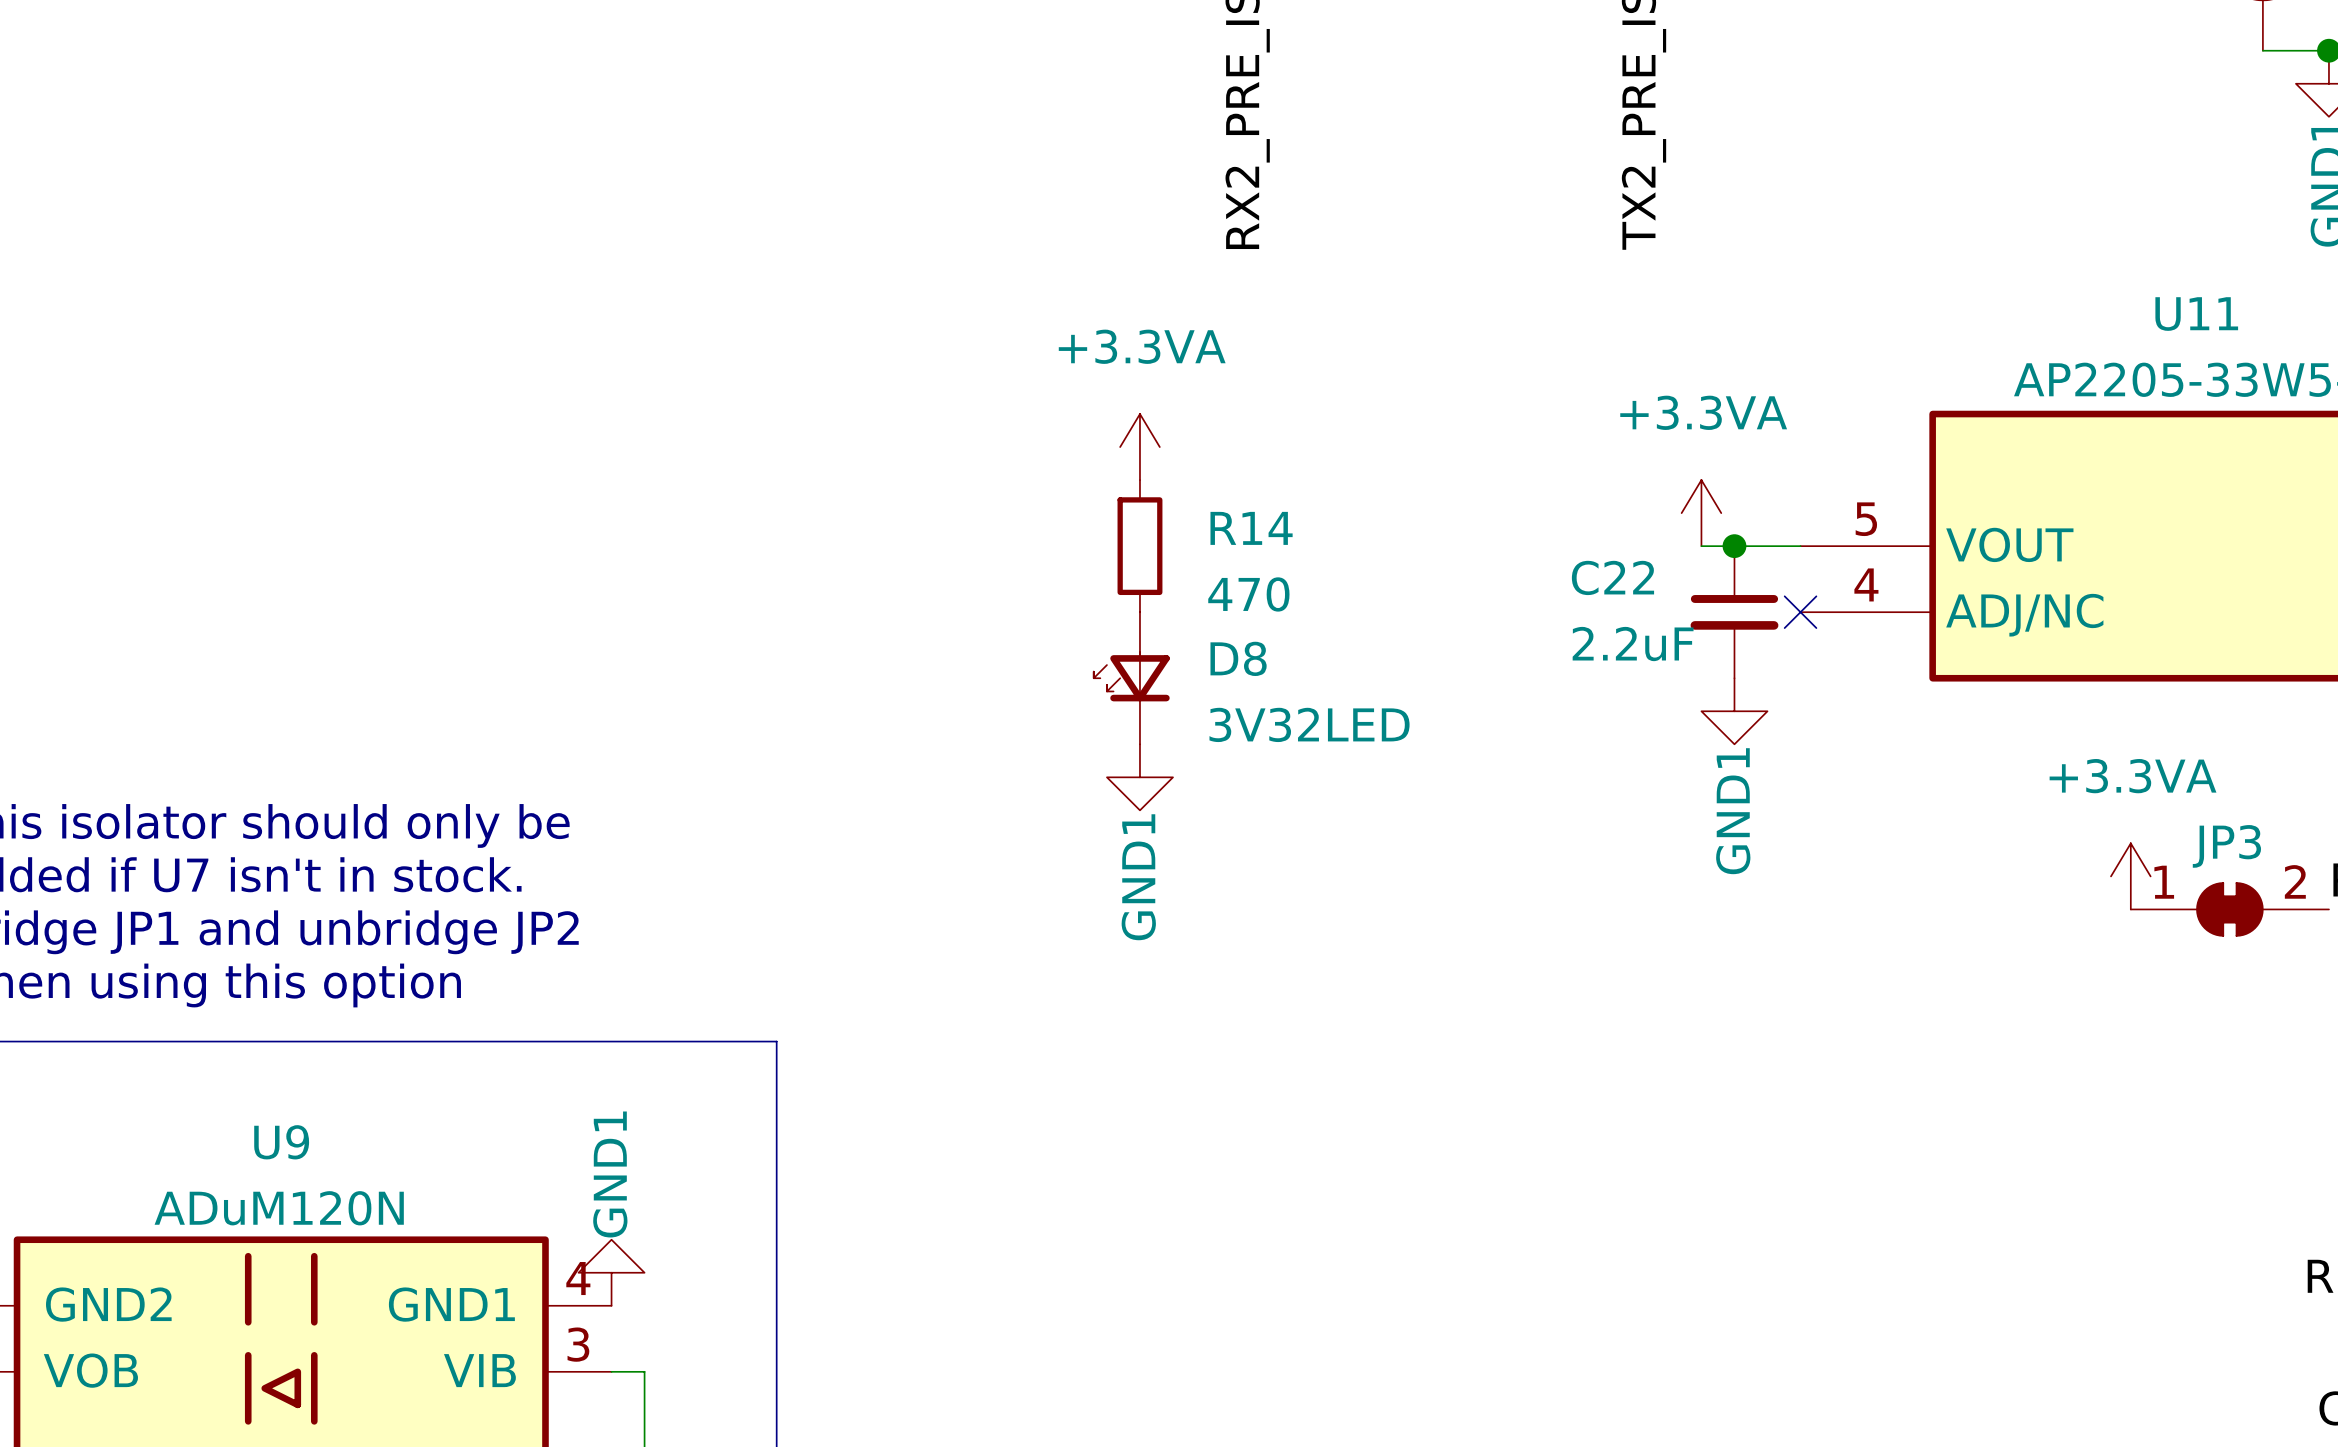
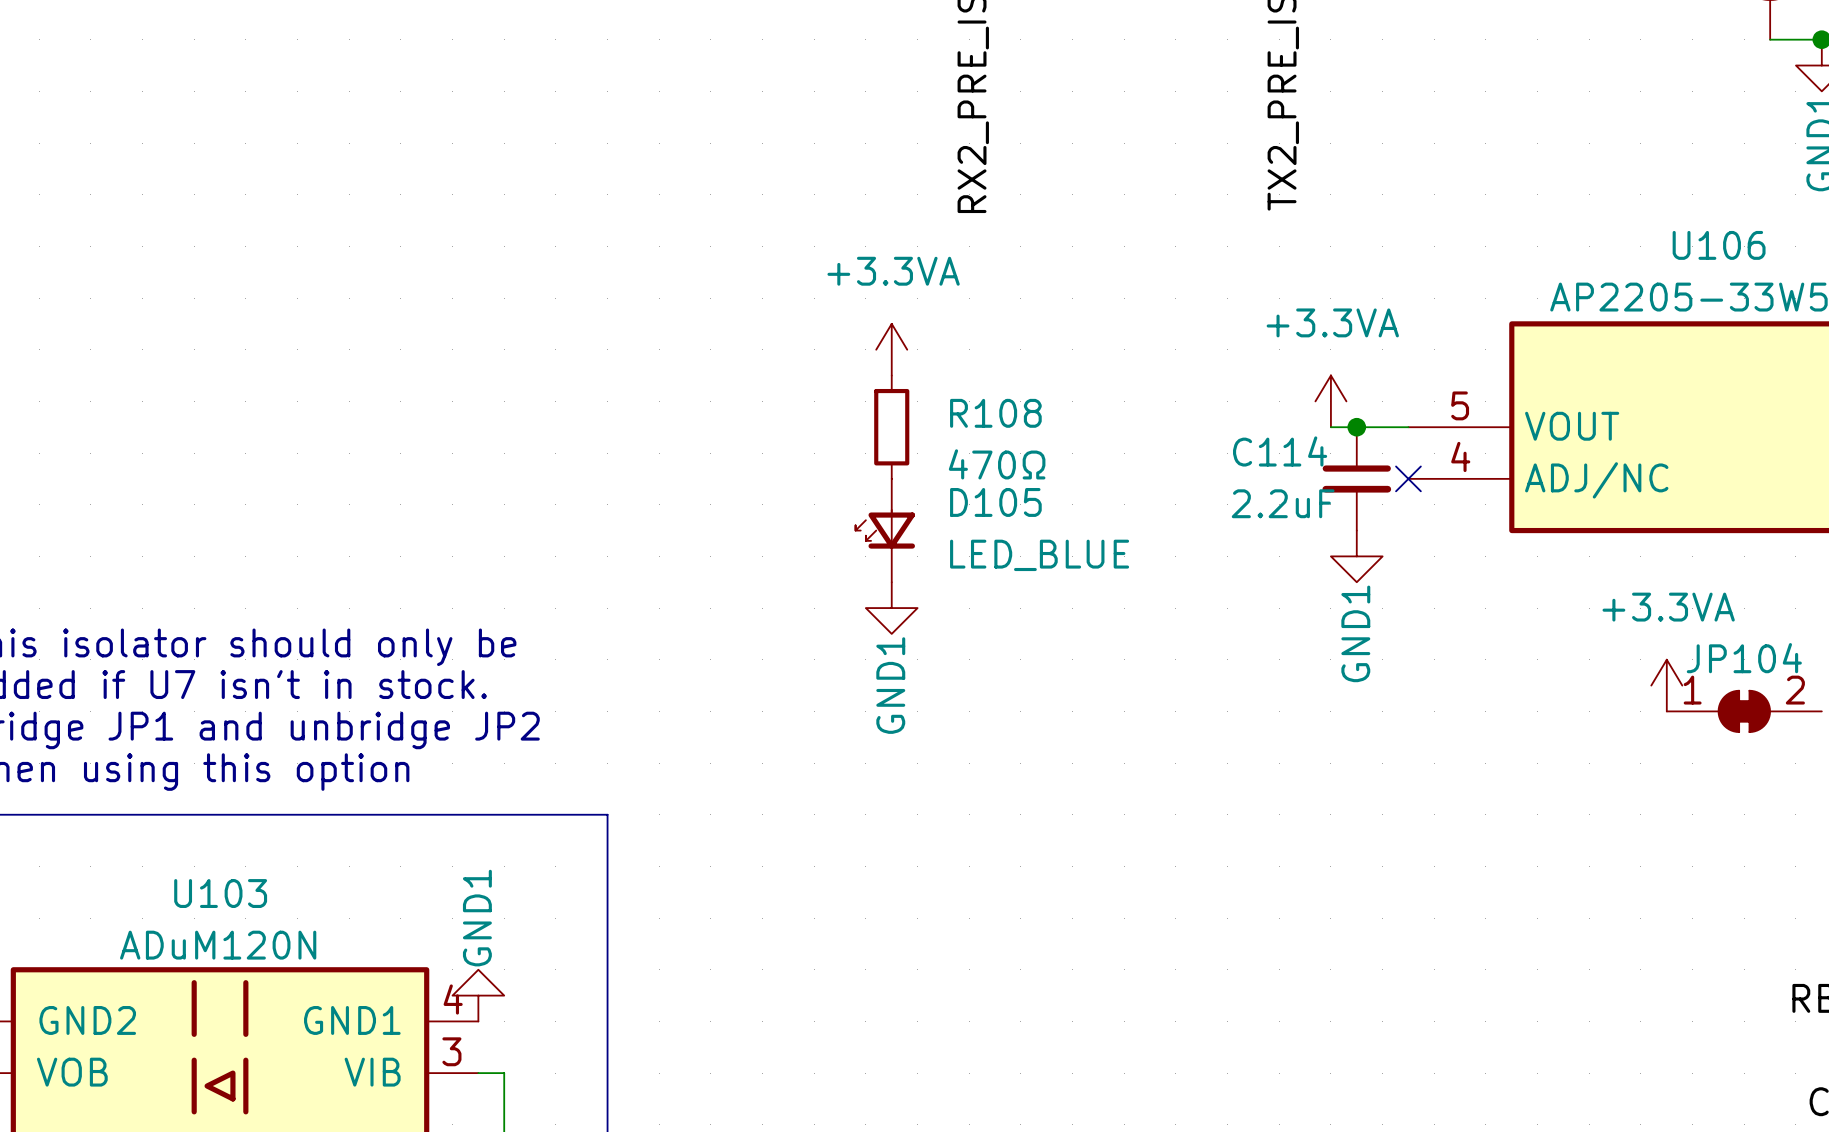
U11 name: U11 (2196, 314) -> U106 (1719, 245)
R14 name: R14 (1251, 528) -> R108 (995, 413)
C22 name: C22 (1612, 577) -> C114 (1280, 451)
R14 value: 470 (1248, 594) -> 470Ω (997, 464)
D8 name: D8 (1238, 658) -> D105 (995, 502)
D8 value: 3V32LED (1309, 724) -> LED_BLUE (1039, 555)
JP3 name: JP3 (2226, 846) -> JP104 (1744, 658)
U9 name: U9 (281, 1142) -> U103 (220, 893)

